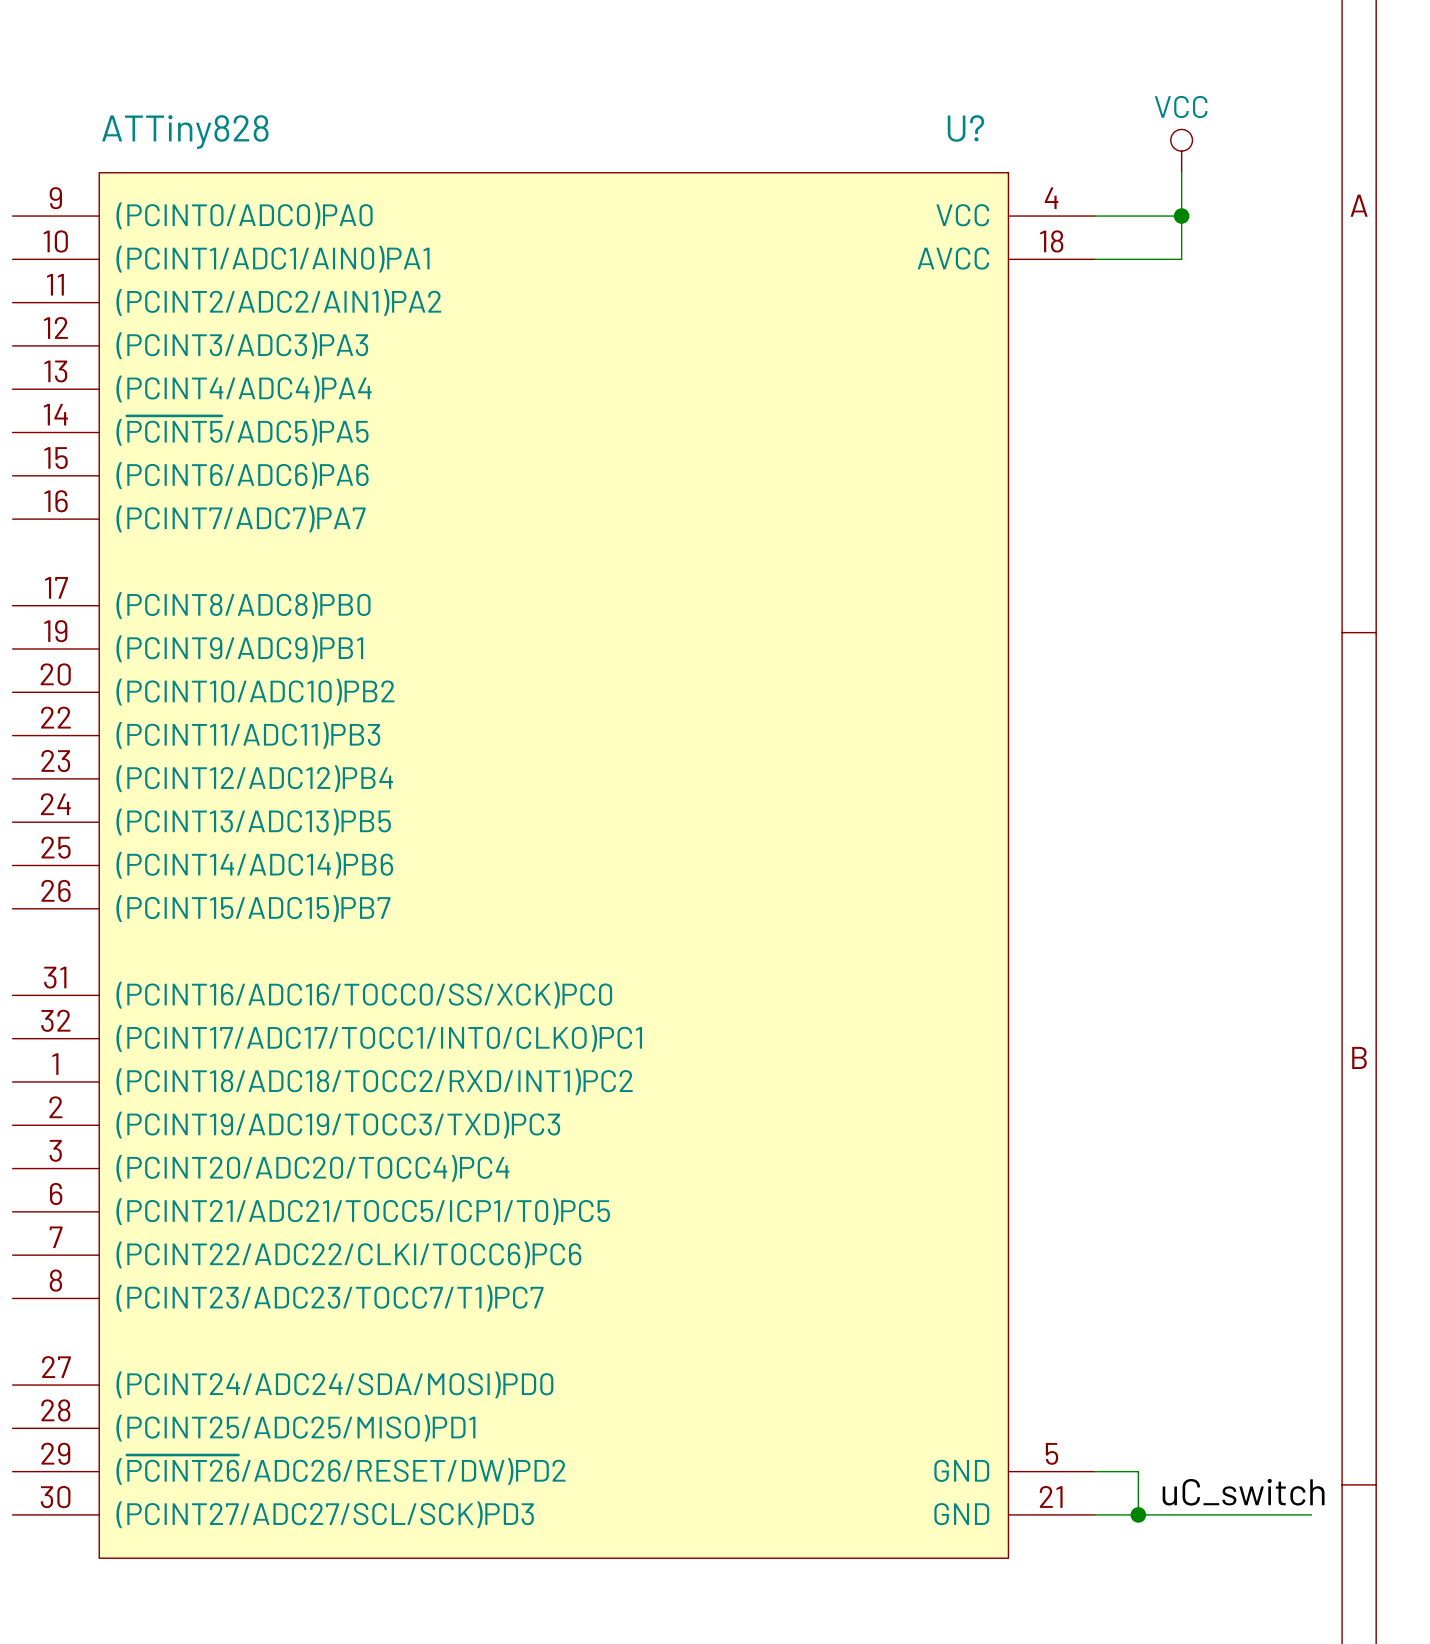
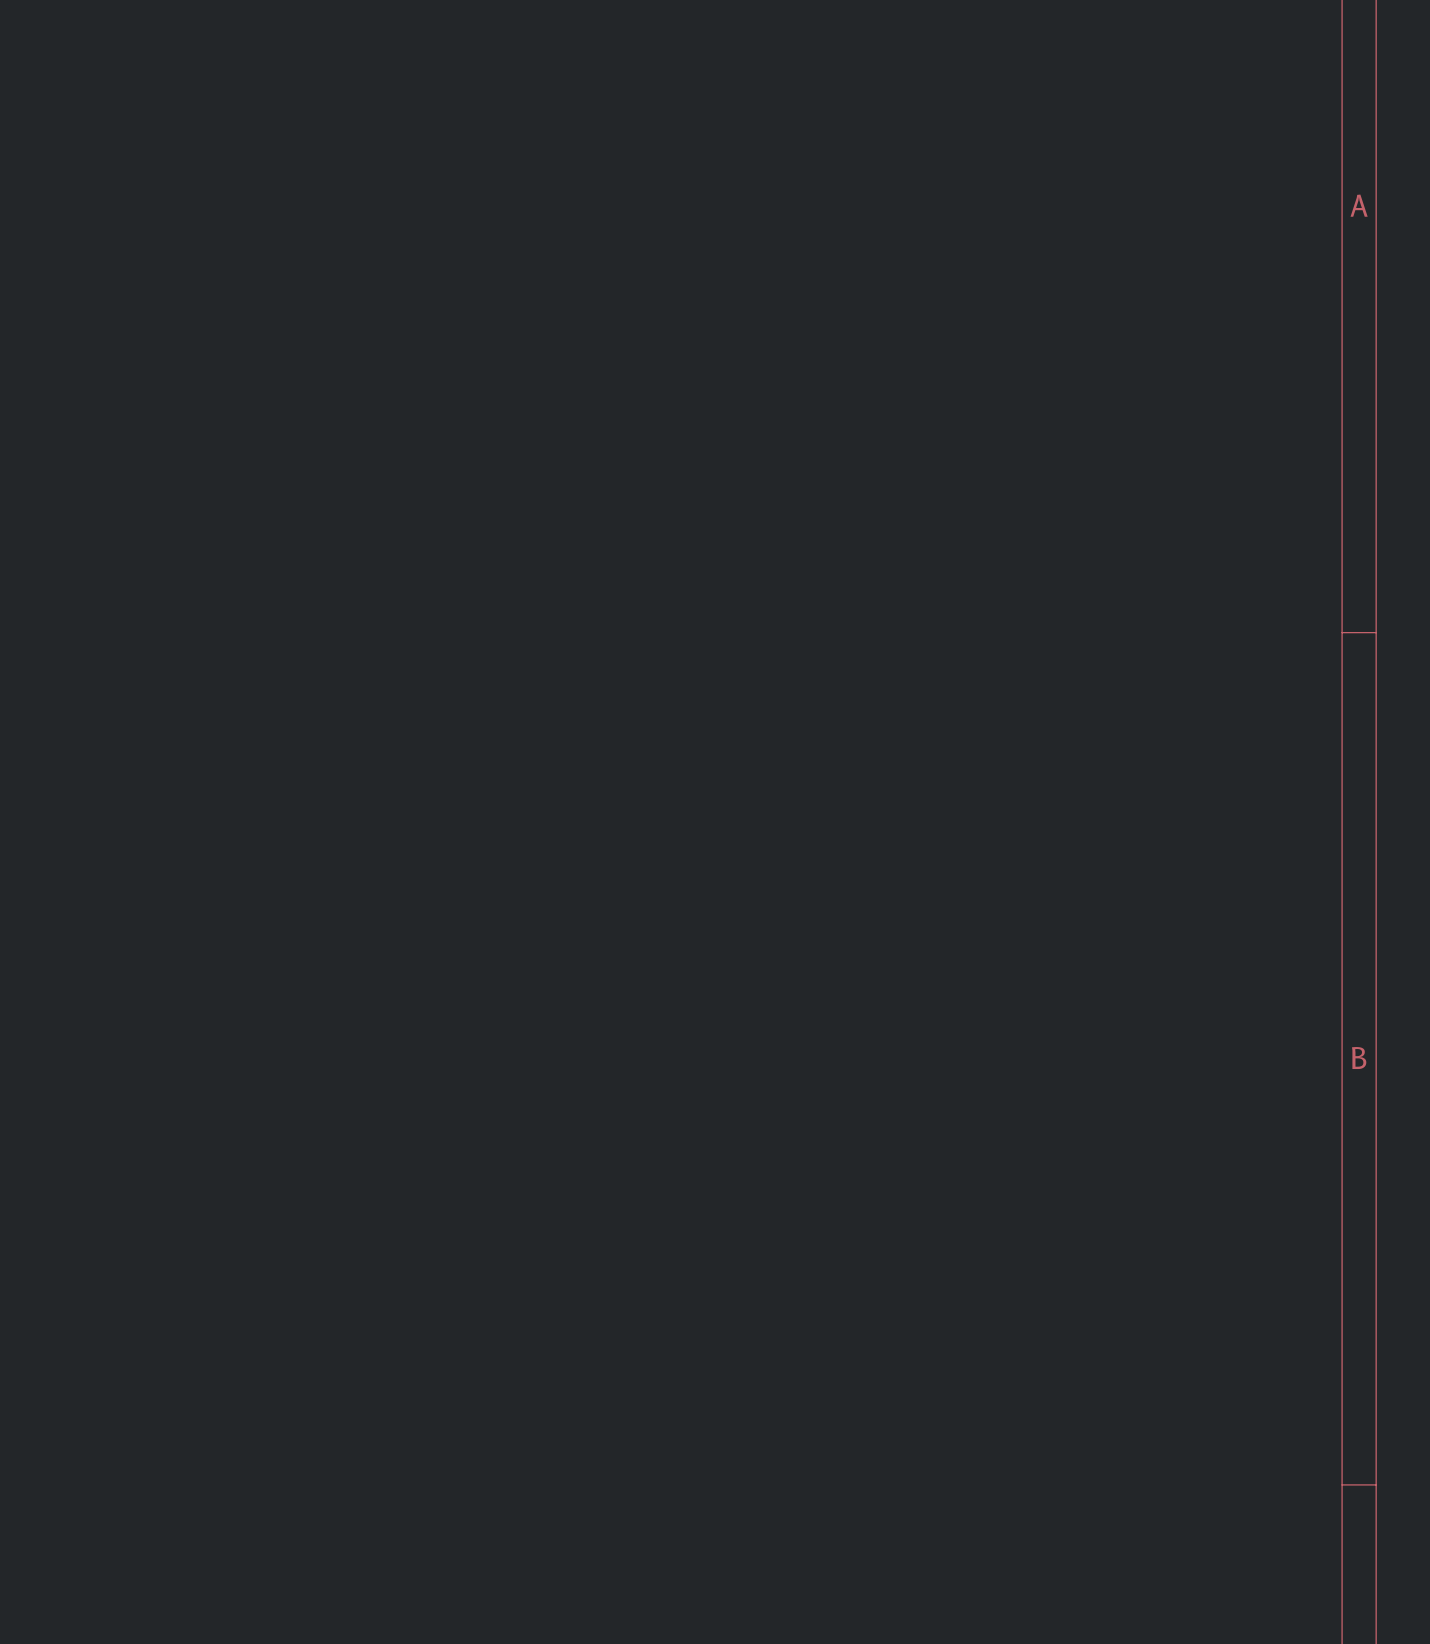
power symbol: VCC (1181, 151) -> none
wire: (1181, 172) (1181, 259) (1095, 259) -> none
wire: (1095, 216) (1181, 216) -> none
junction: (1181, 216) -> none
U?: ATTiny828 (553, 865) -> none
wire: (1095, 1471) (1138, 1471) (1138, 1514) -> none
label: uC_switch (1243, 1492) -> none
wire: (1095, 1514) (1311, 1514) -> none
junction: (1138, 1514) -> none

